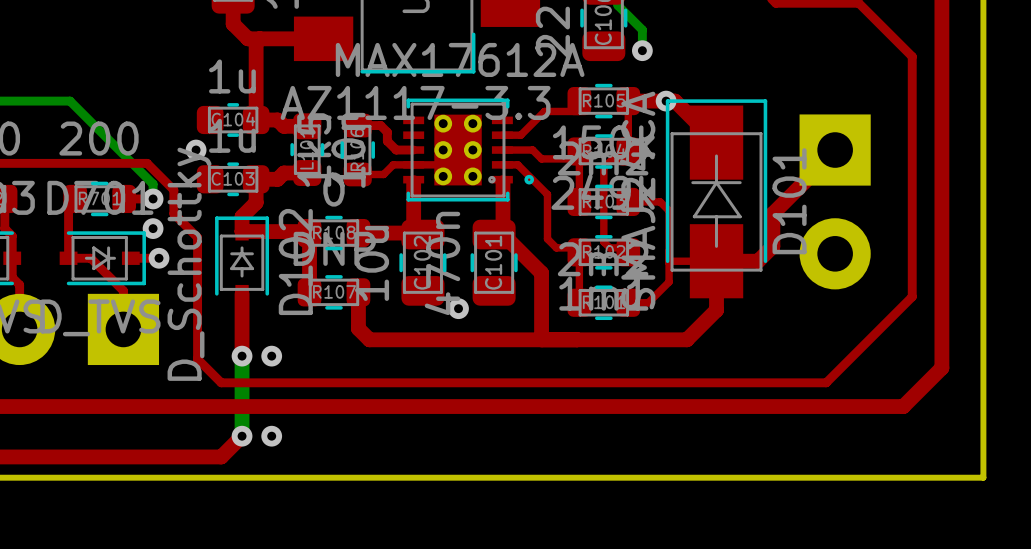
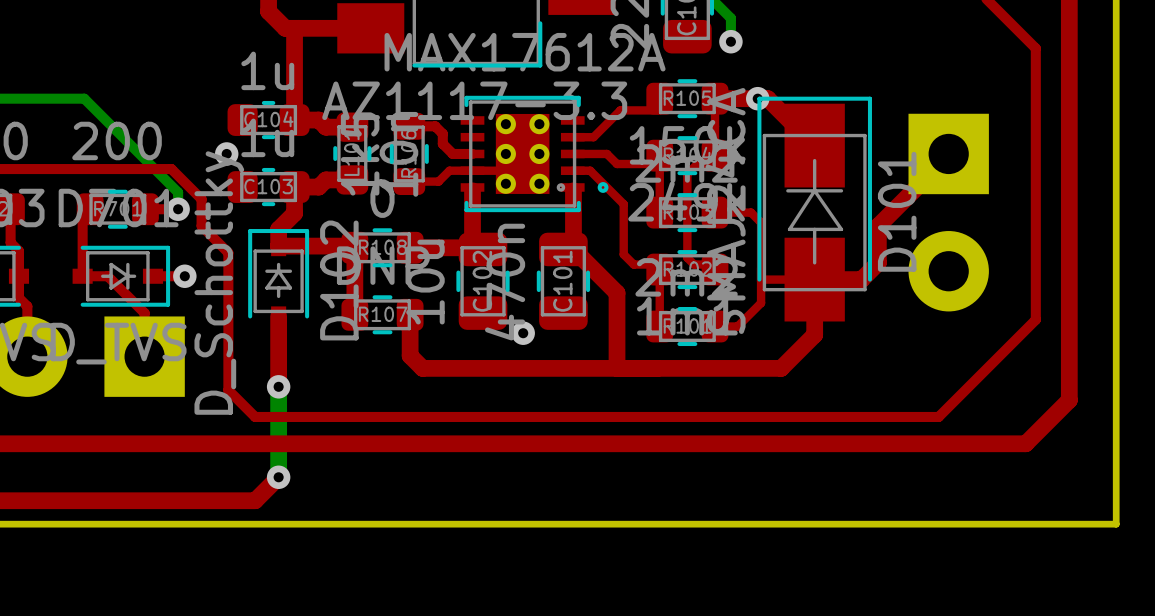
via: (153, 228) -> none
via: (271, 356) -> none
via: (271, 436) -> none

